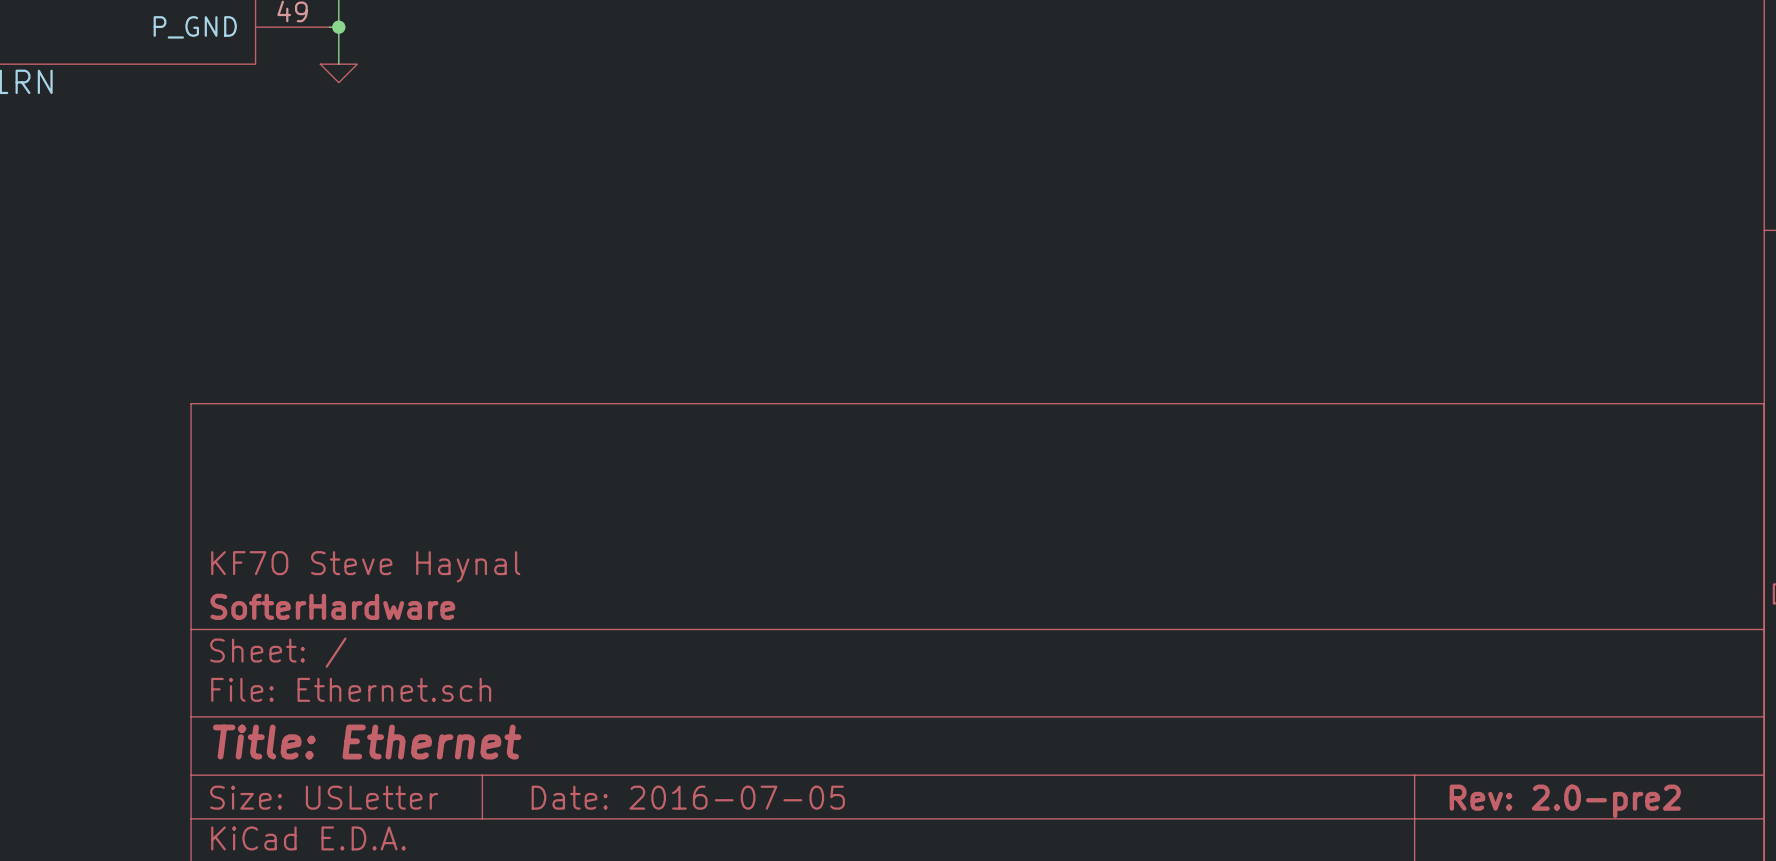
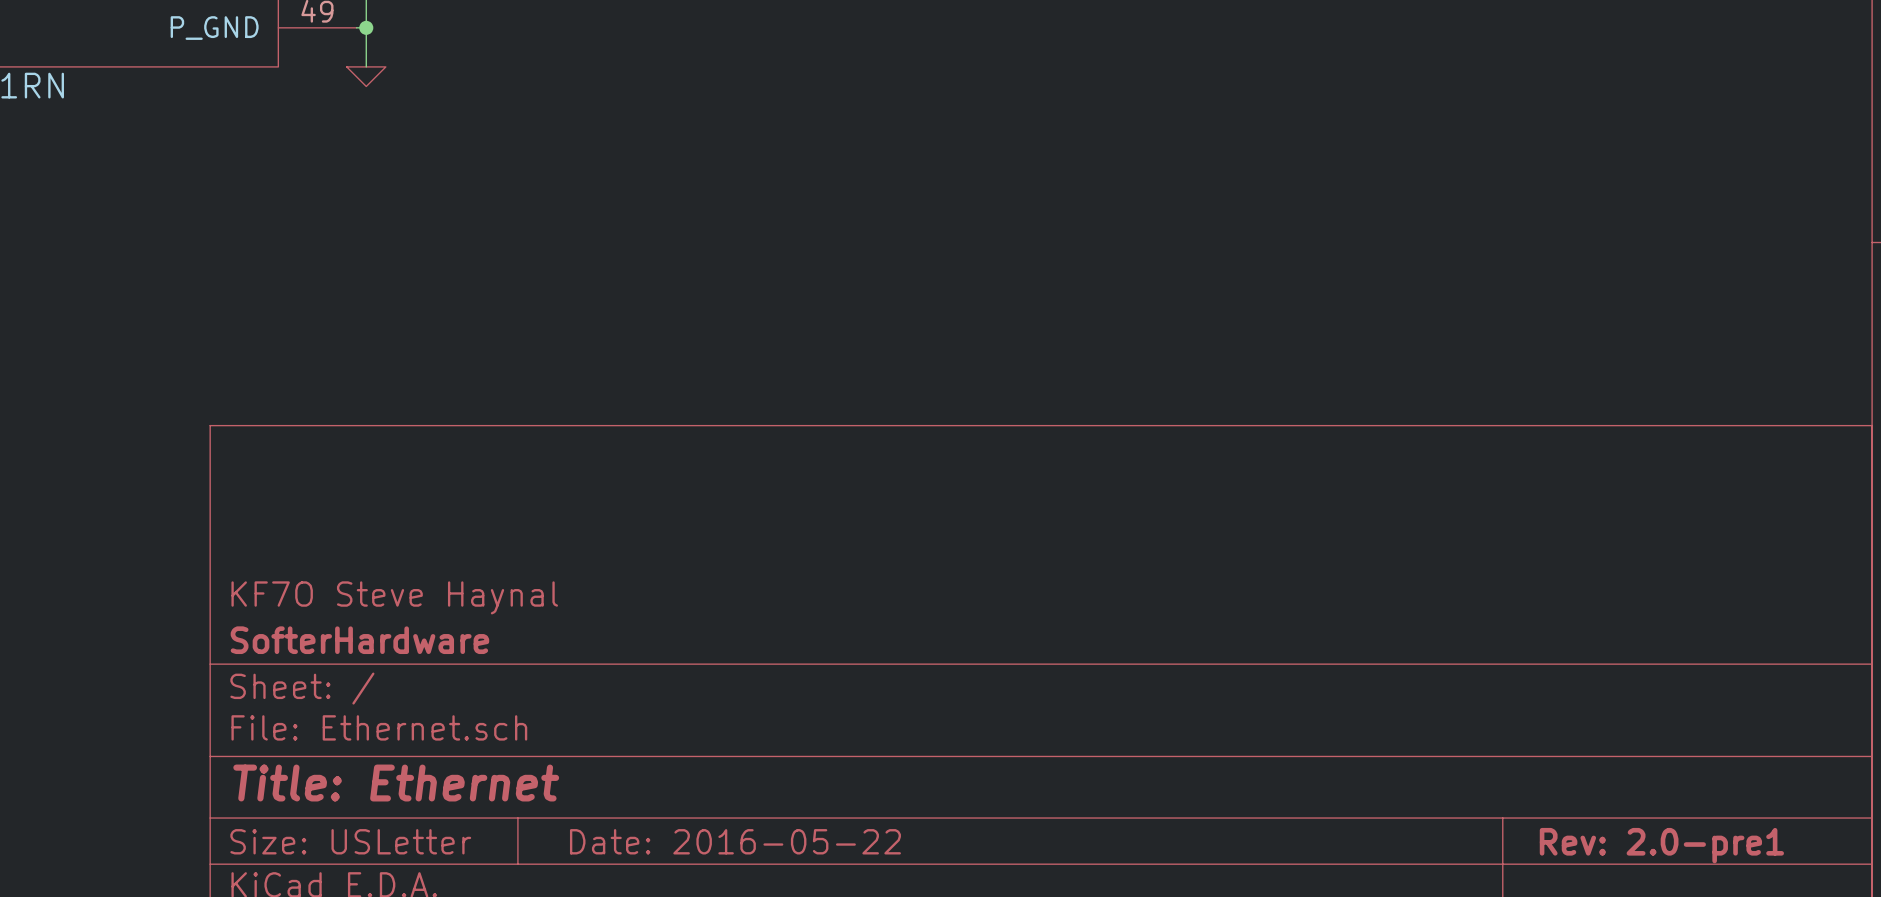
title block: Date: 2016-07-05 (688, 797) -> Date: 2016-05-22 (735, 841)
title block: Rev: 2.0-pre2 (1565, 801) -> Rev: 2.0-pre1 (1661, 845)

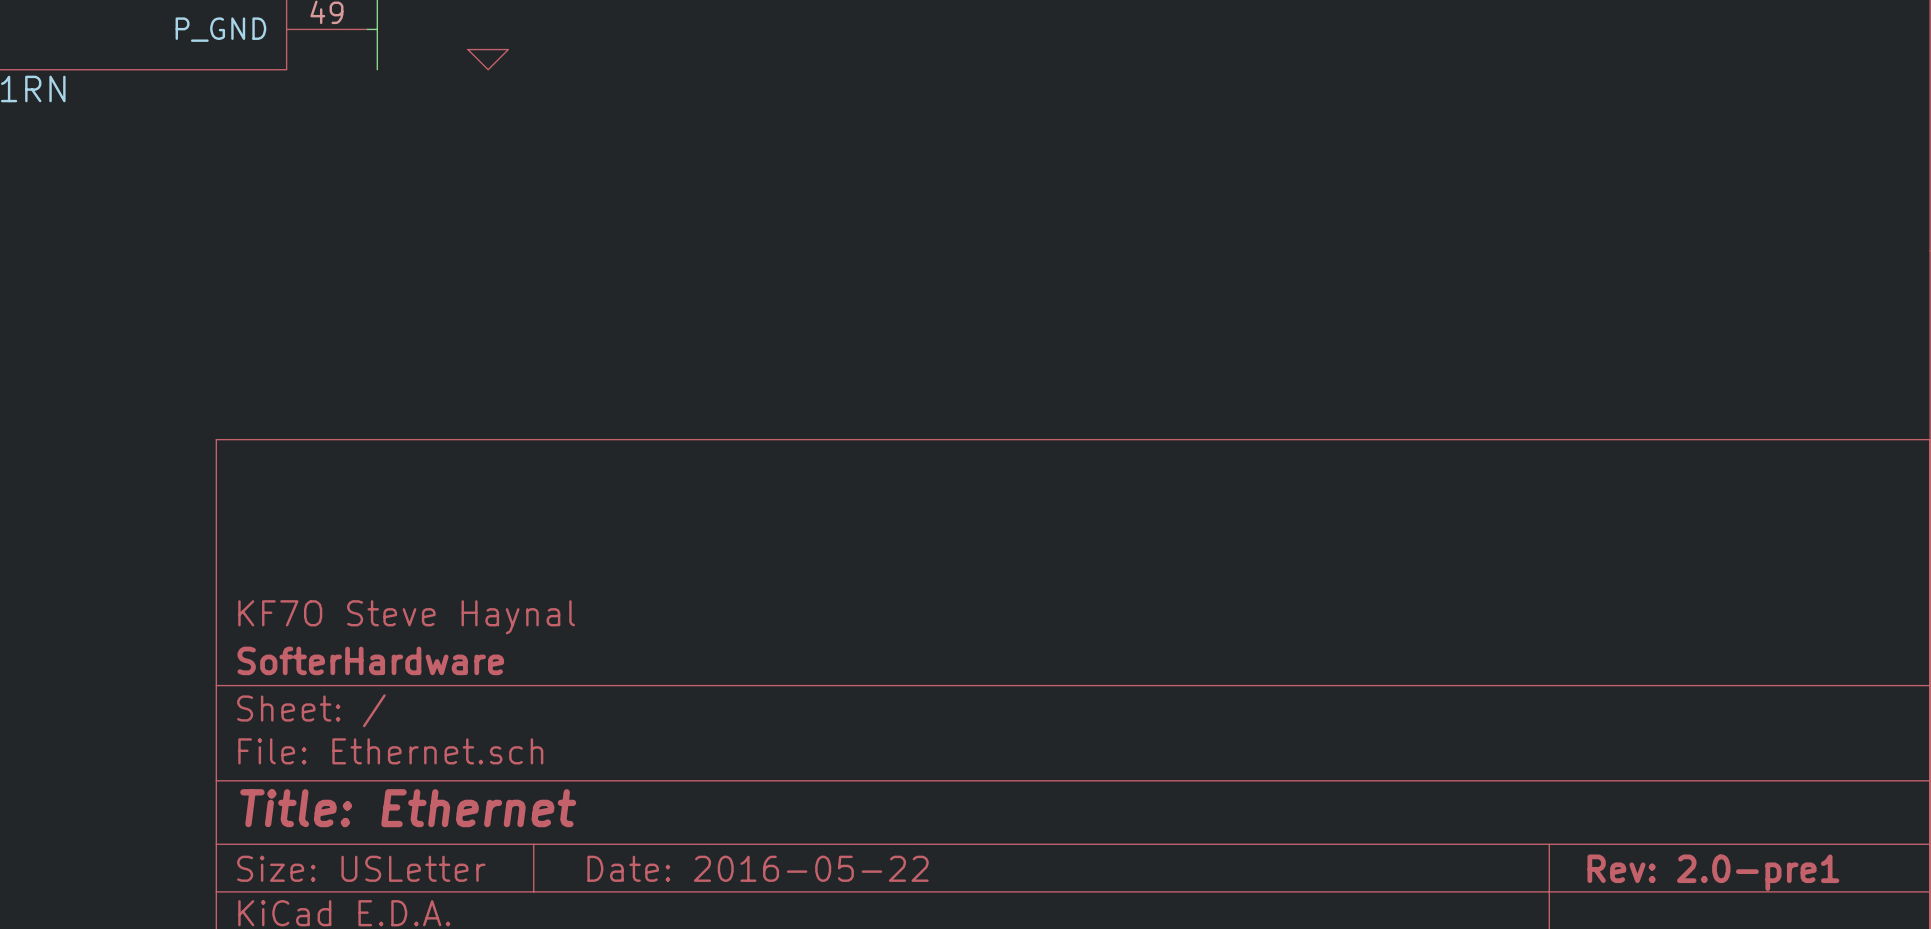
junction: (366, 27) -> none
power symbol: none -> (488, 59)
power symbol: (366, 76) -> none

